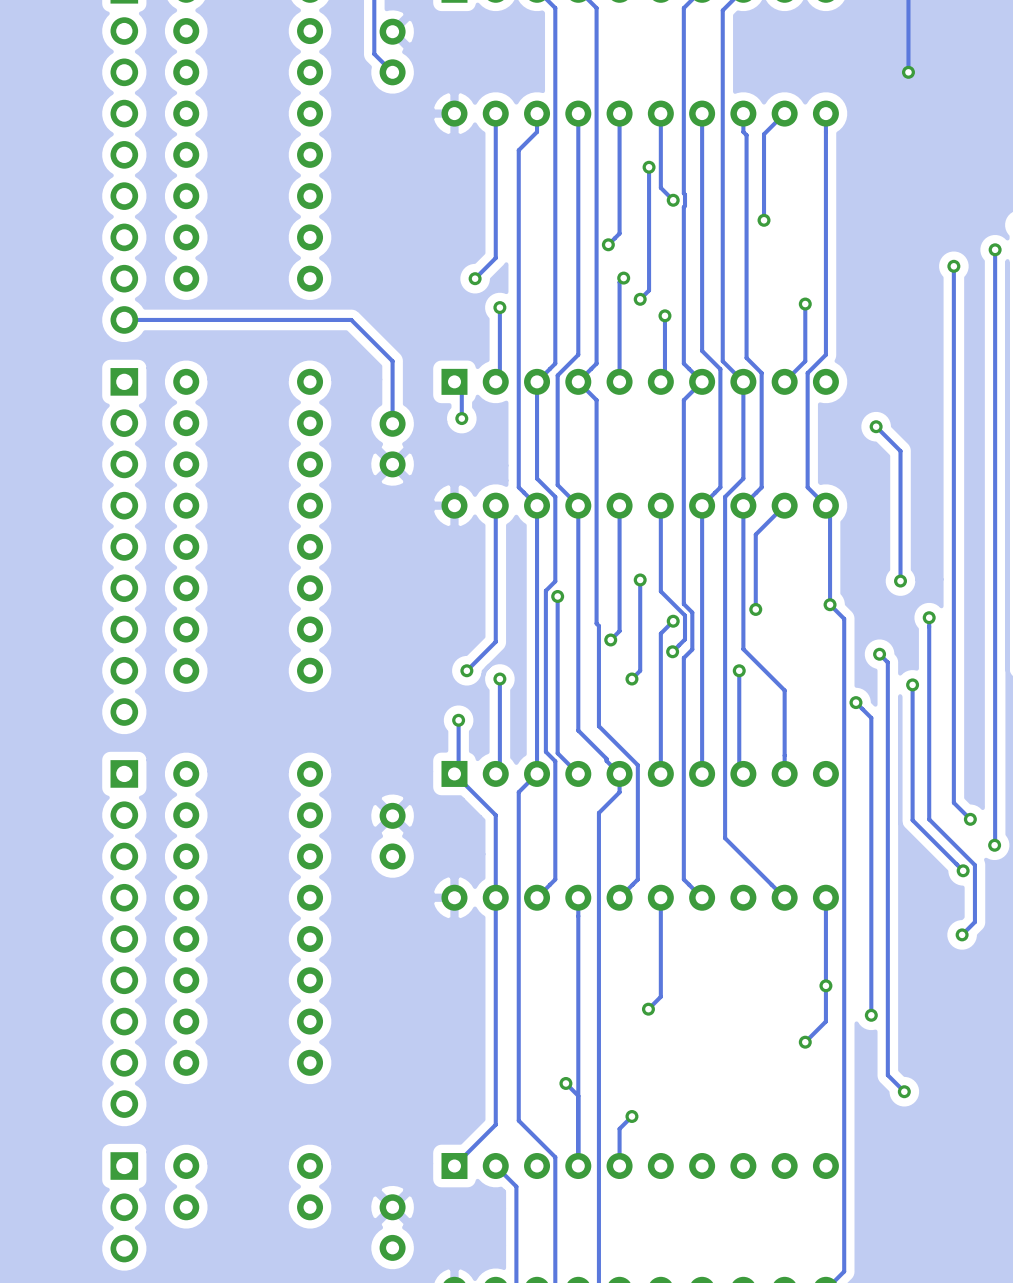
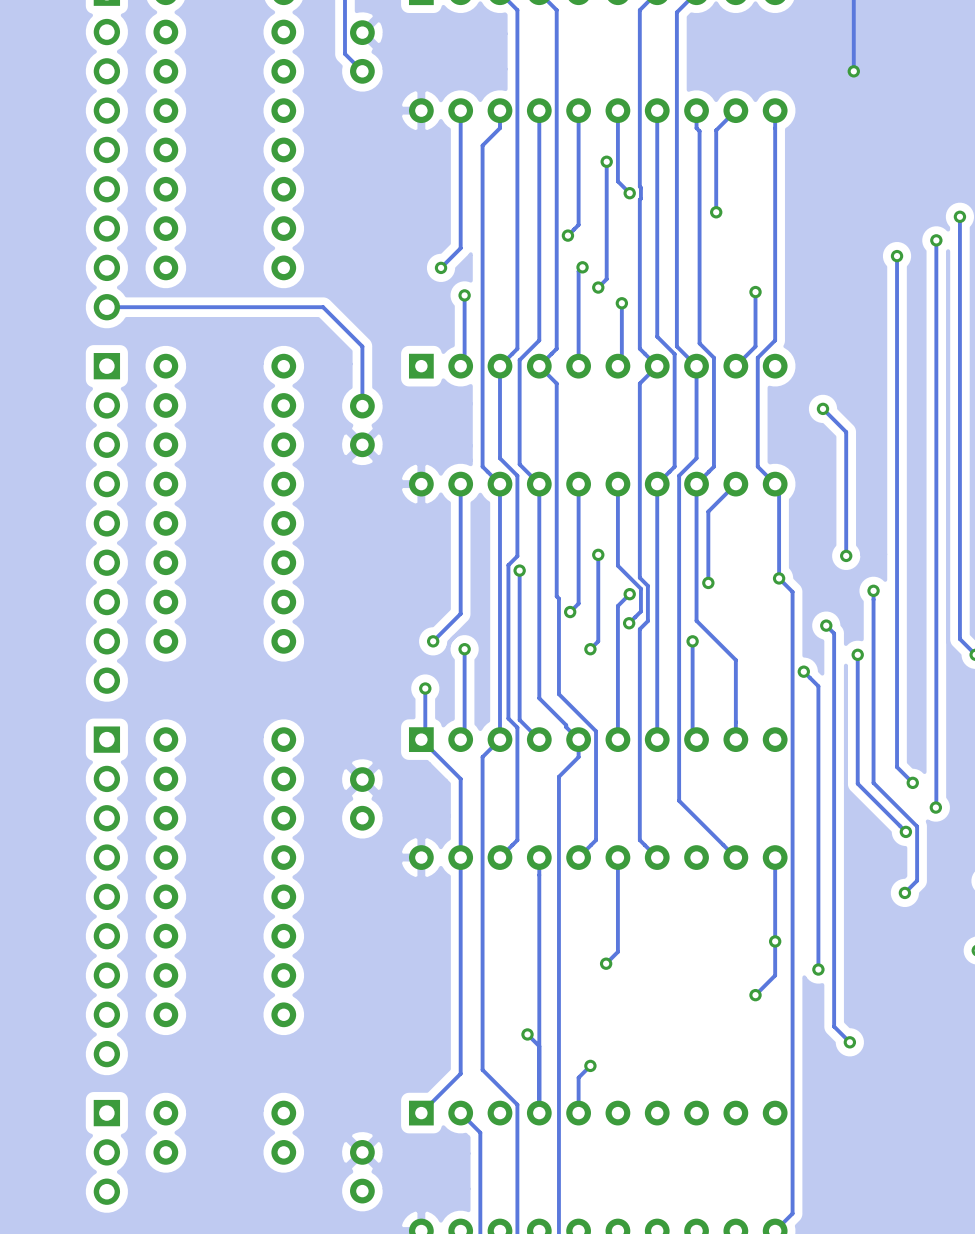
track: (461, 389) (461, 418) -> none
via: (461, 418) -> none

